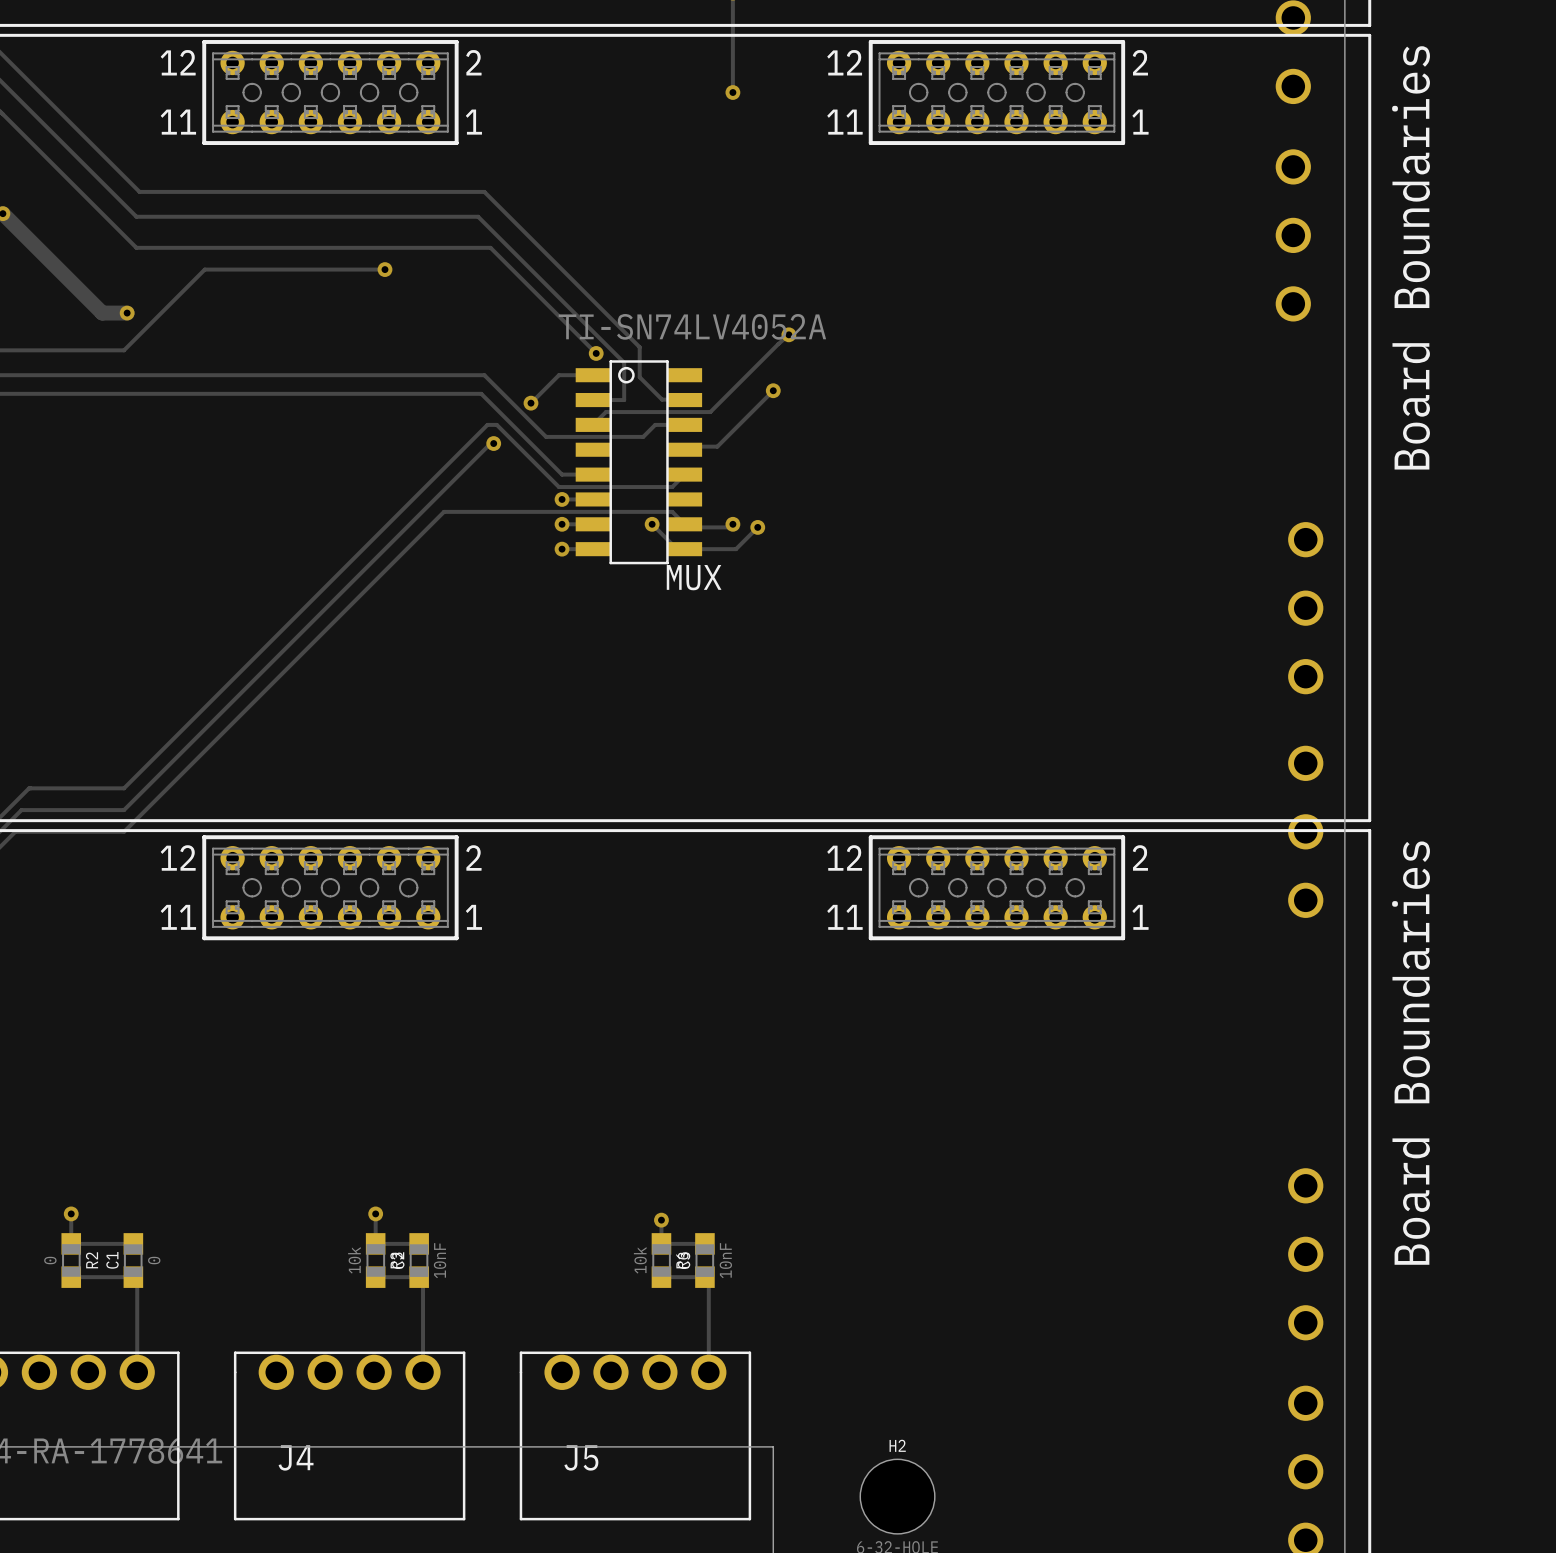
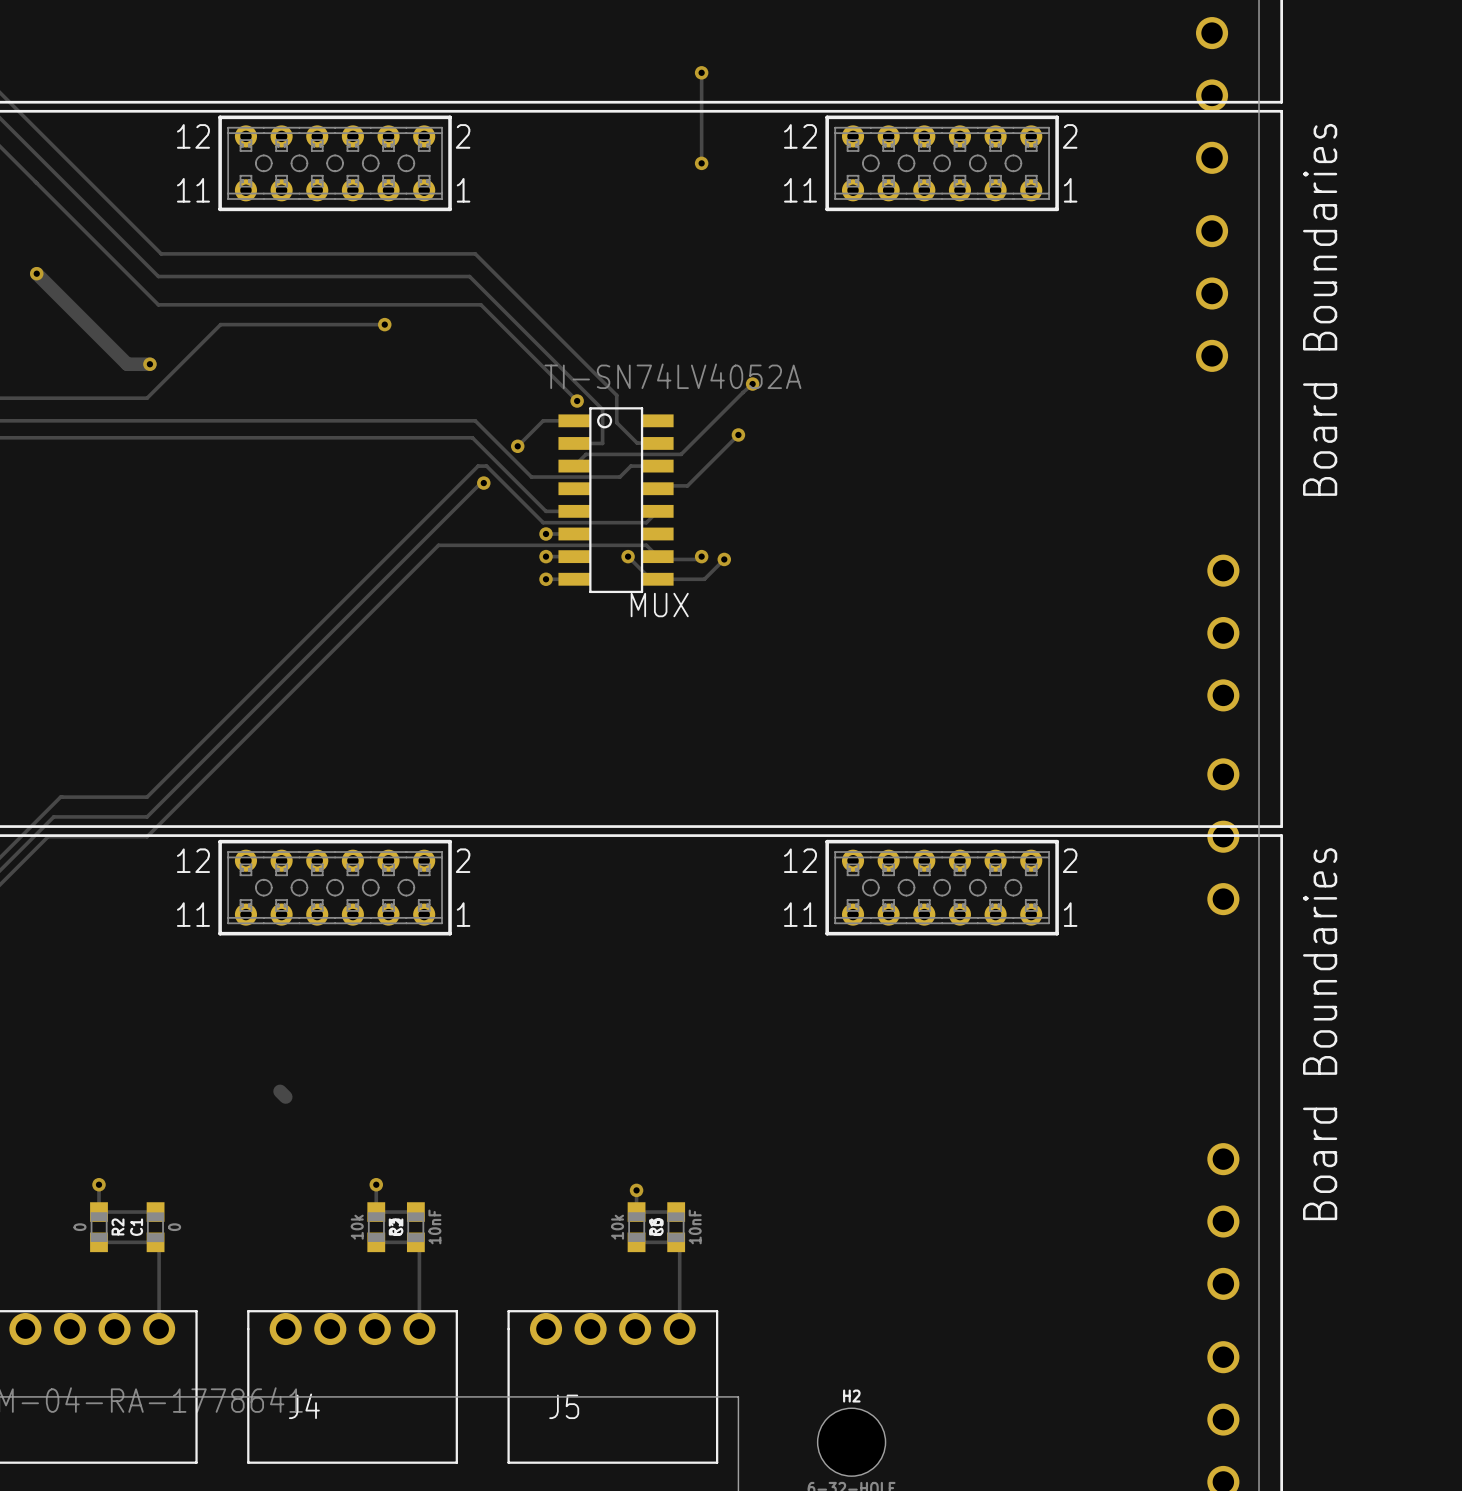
track: none -> (280, 1091) (285, 1097)

